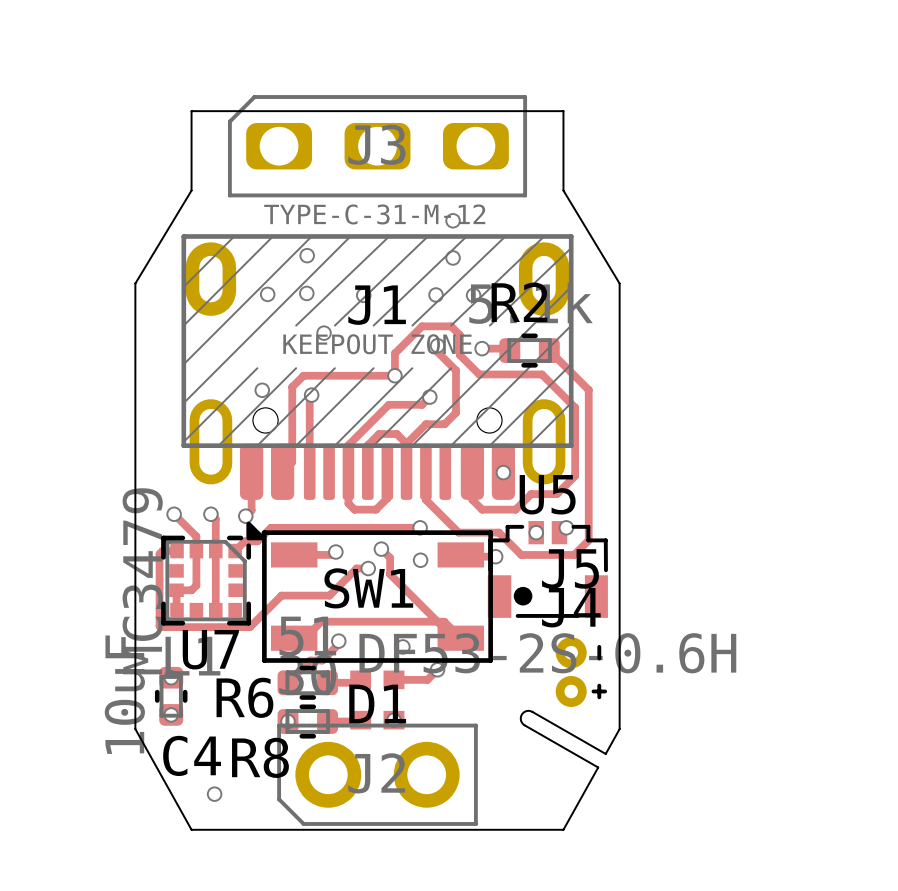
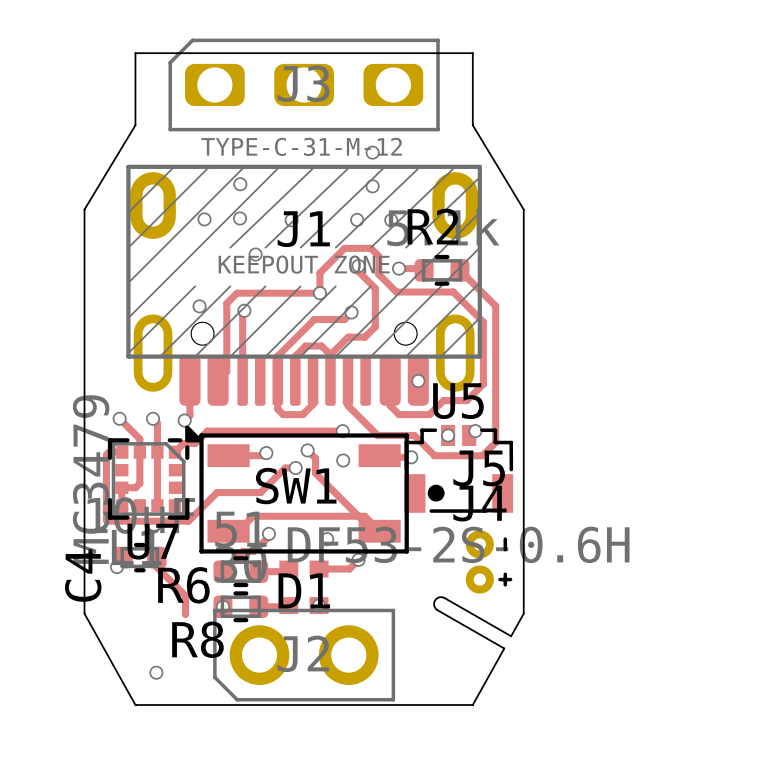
track: none -> (156, 557) (156, 567) (185, 595) (185, 614)
C4 rotation: 0° (171, 696) -> 90° clockwise (139, 557)
C4 position: (171, 696) -> (139, 557)
via: (171, 714) -> none

